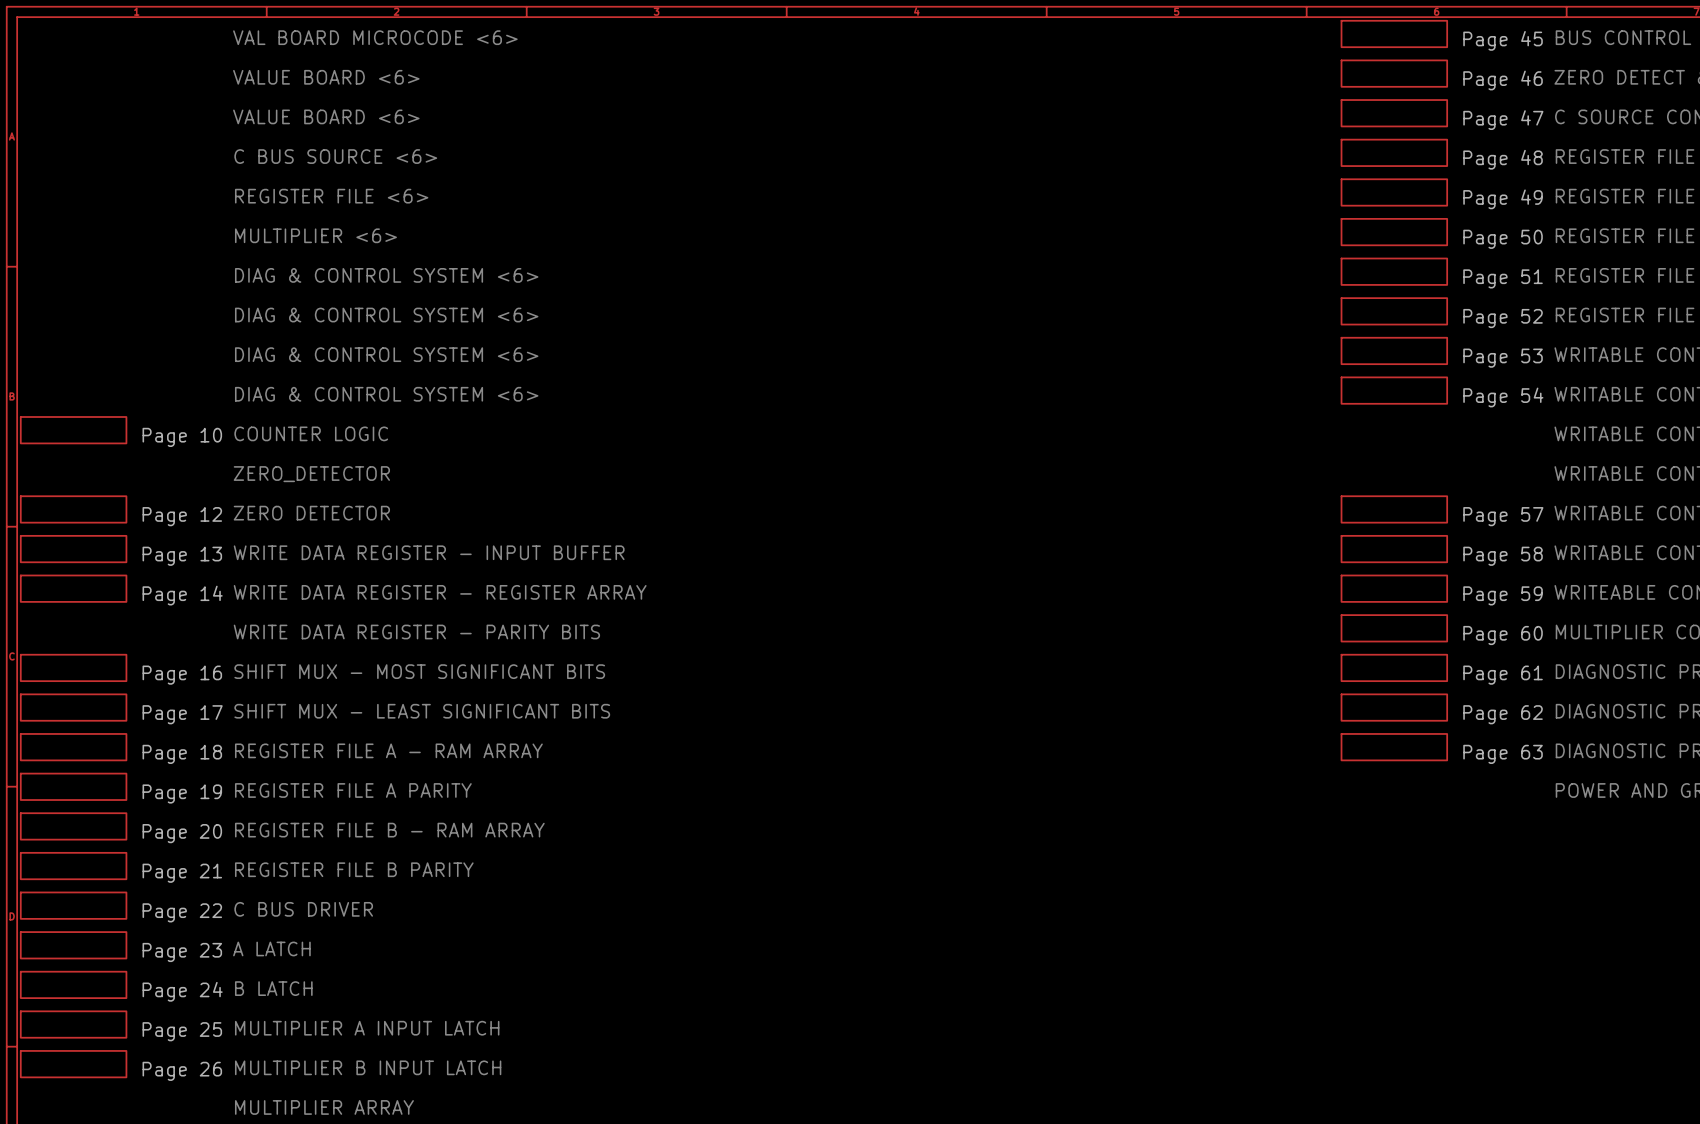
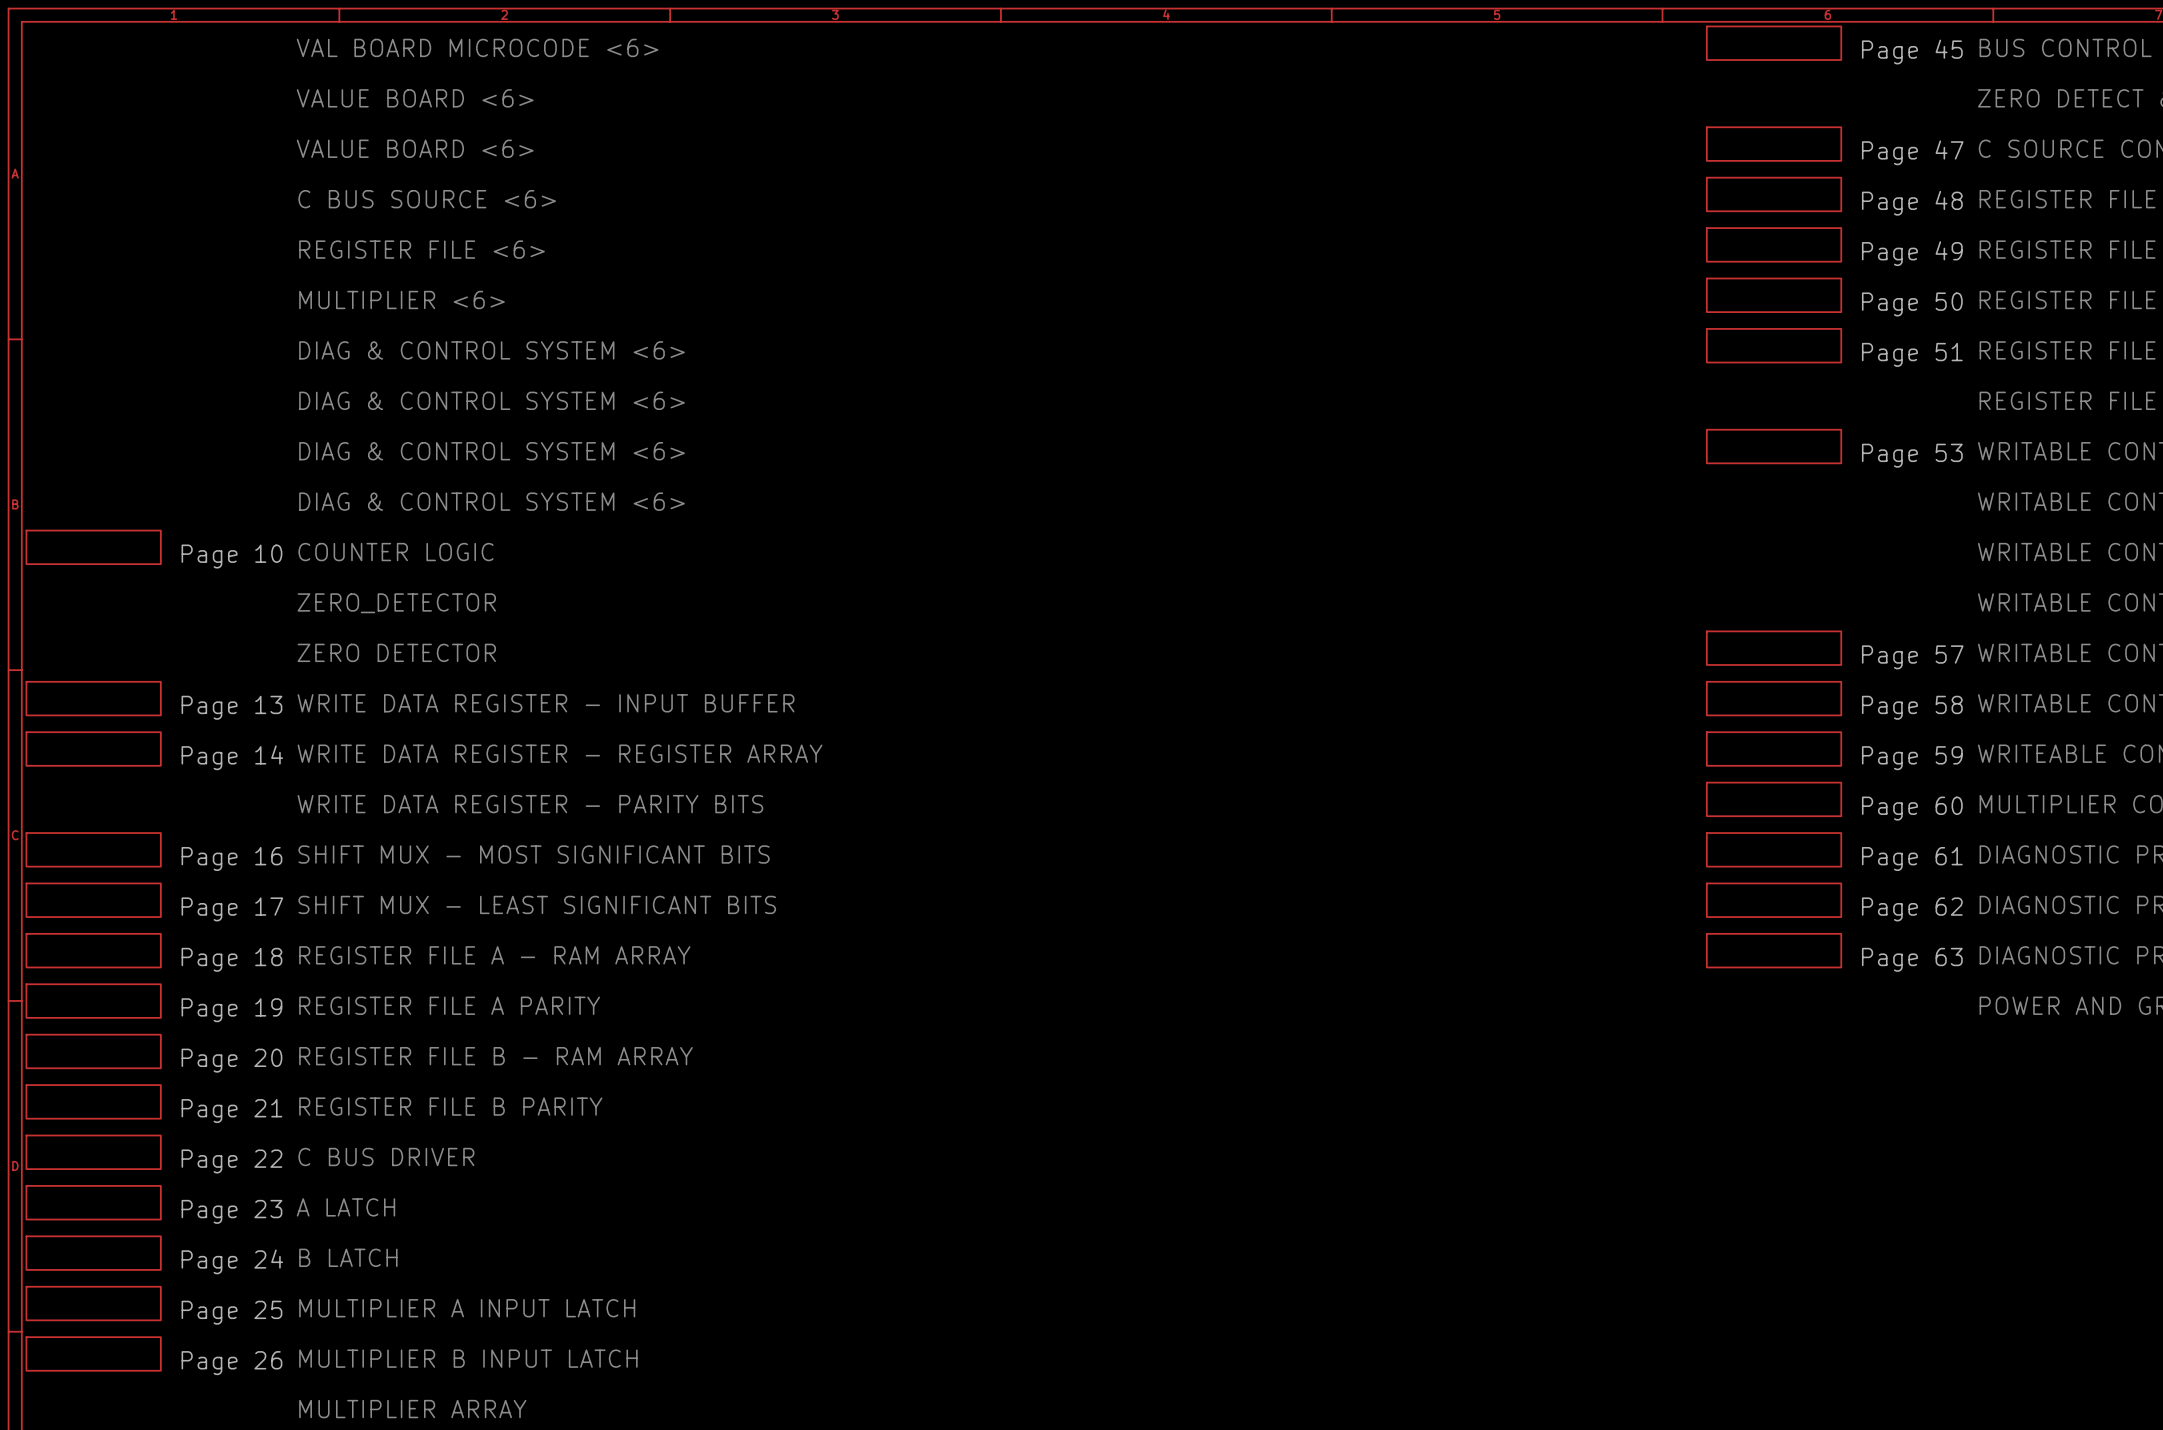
sheet Page 46: (1394, 73) -> none
sheet Page 52: (1394, 311) -> none
sheet Page 54: (1394, 390) -> none
sheet Page 12: (73, 509) -> none

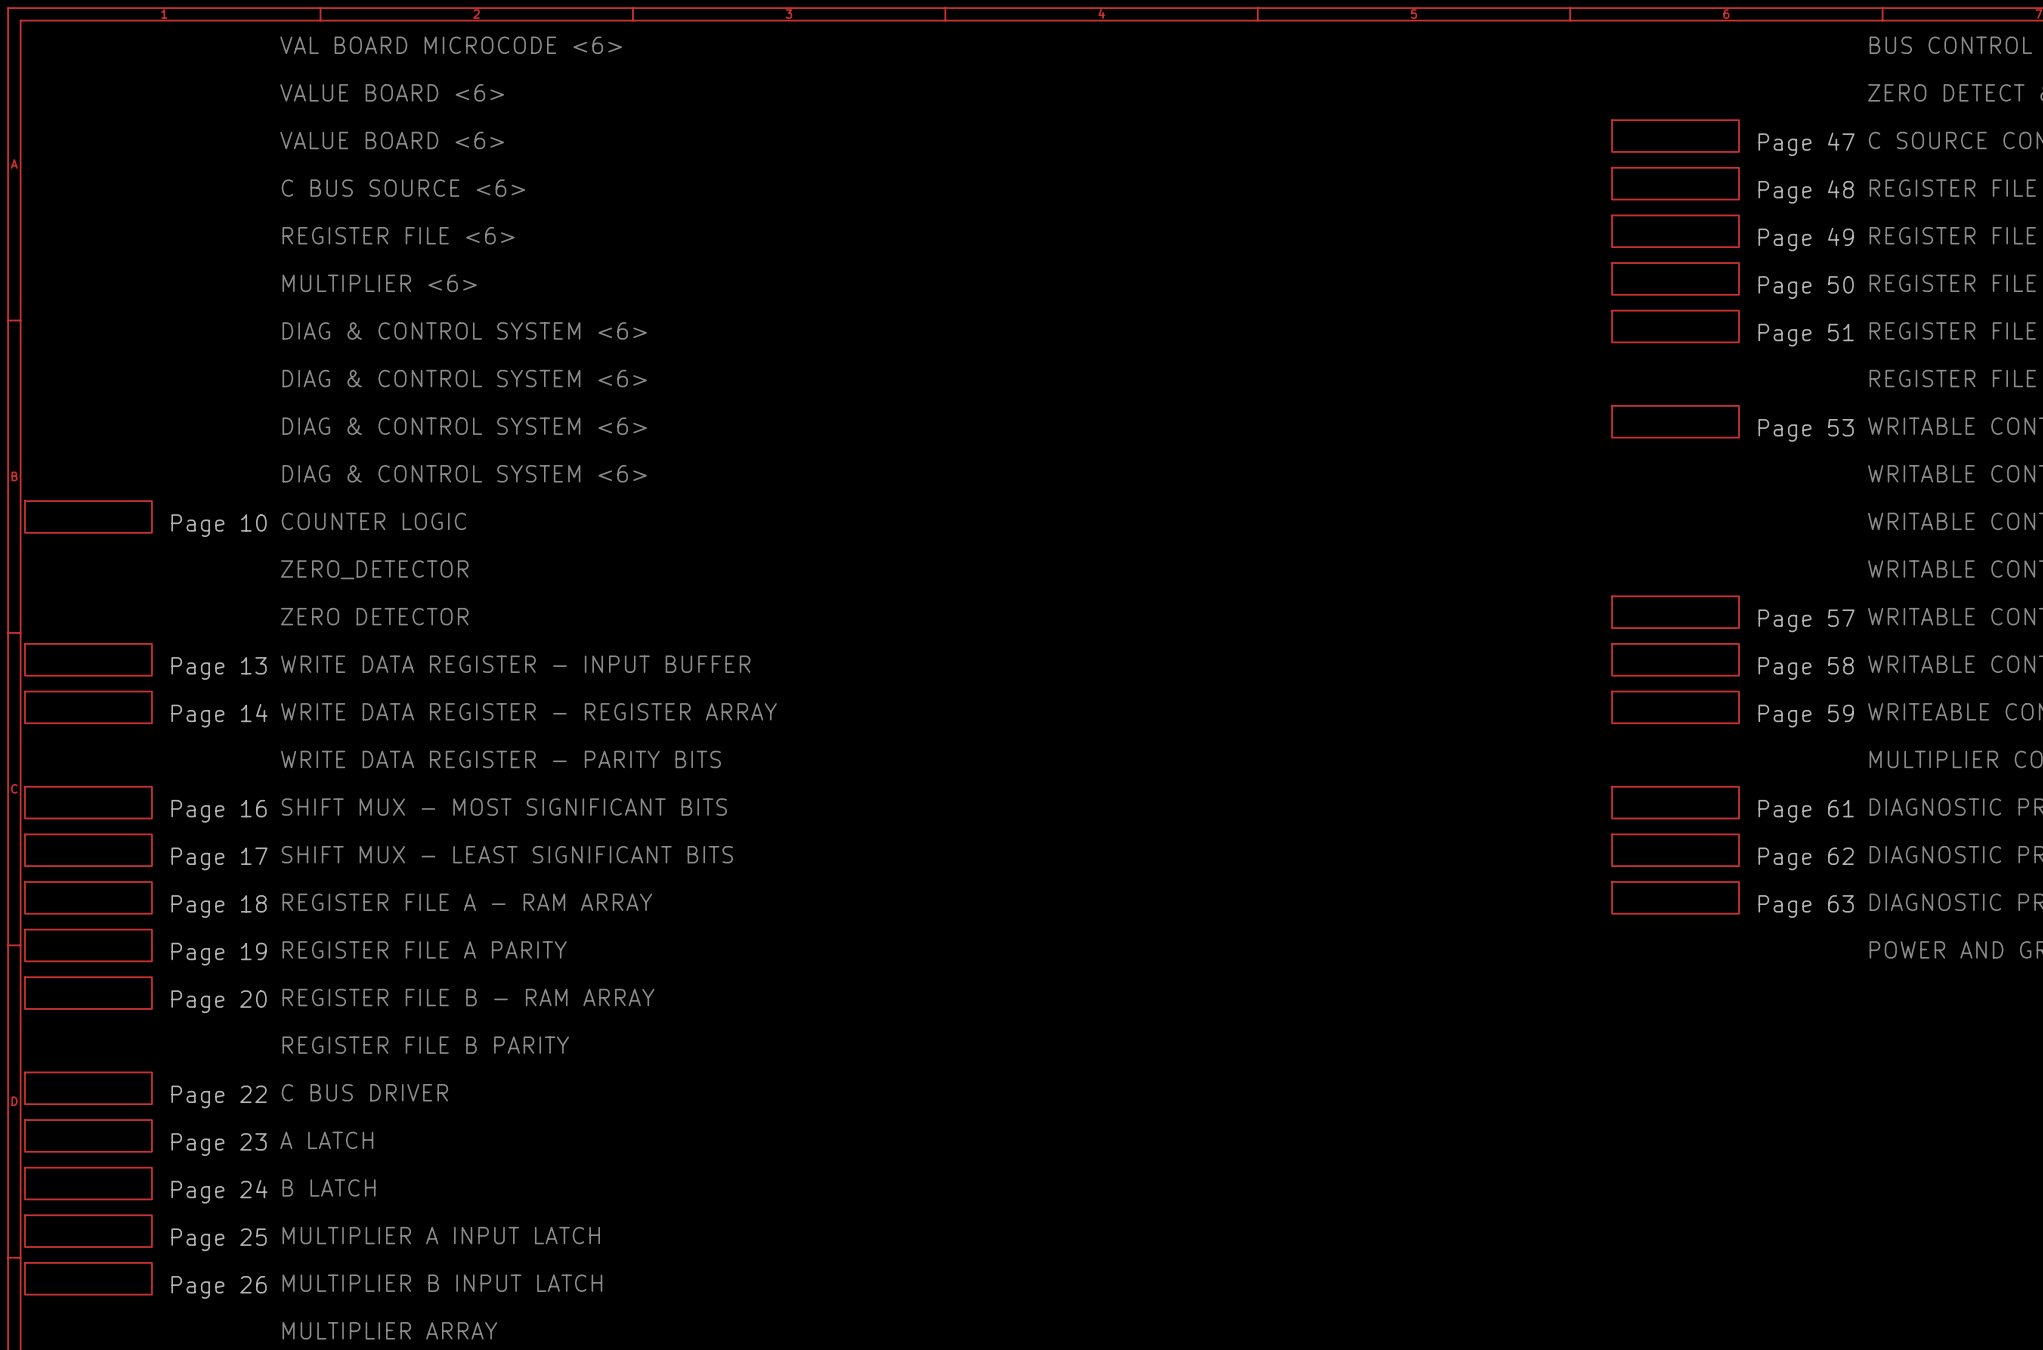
sheet Page 45: (1774, 43) -> none
sheet Page 60: (1774, 799) -> none
sheet Page 21: (93, 1101) -> none

